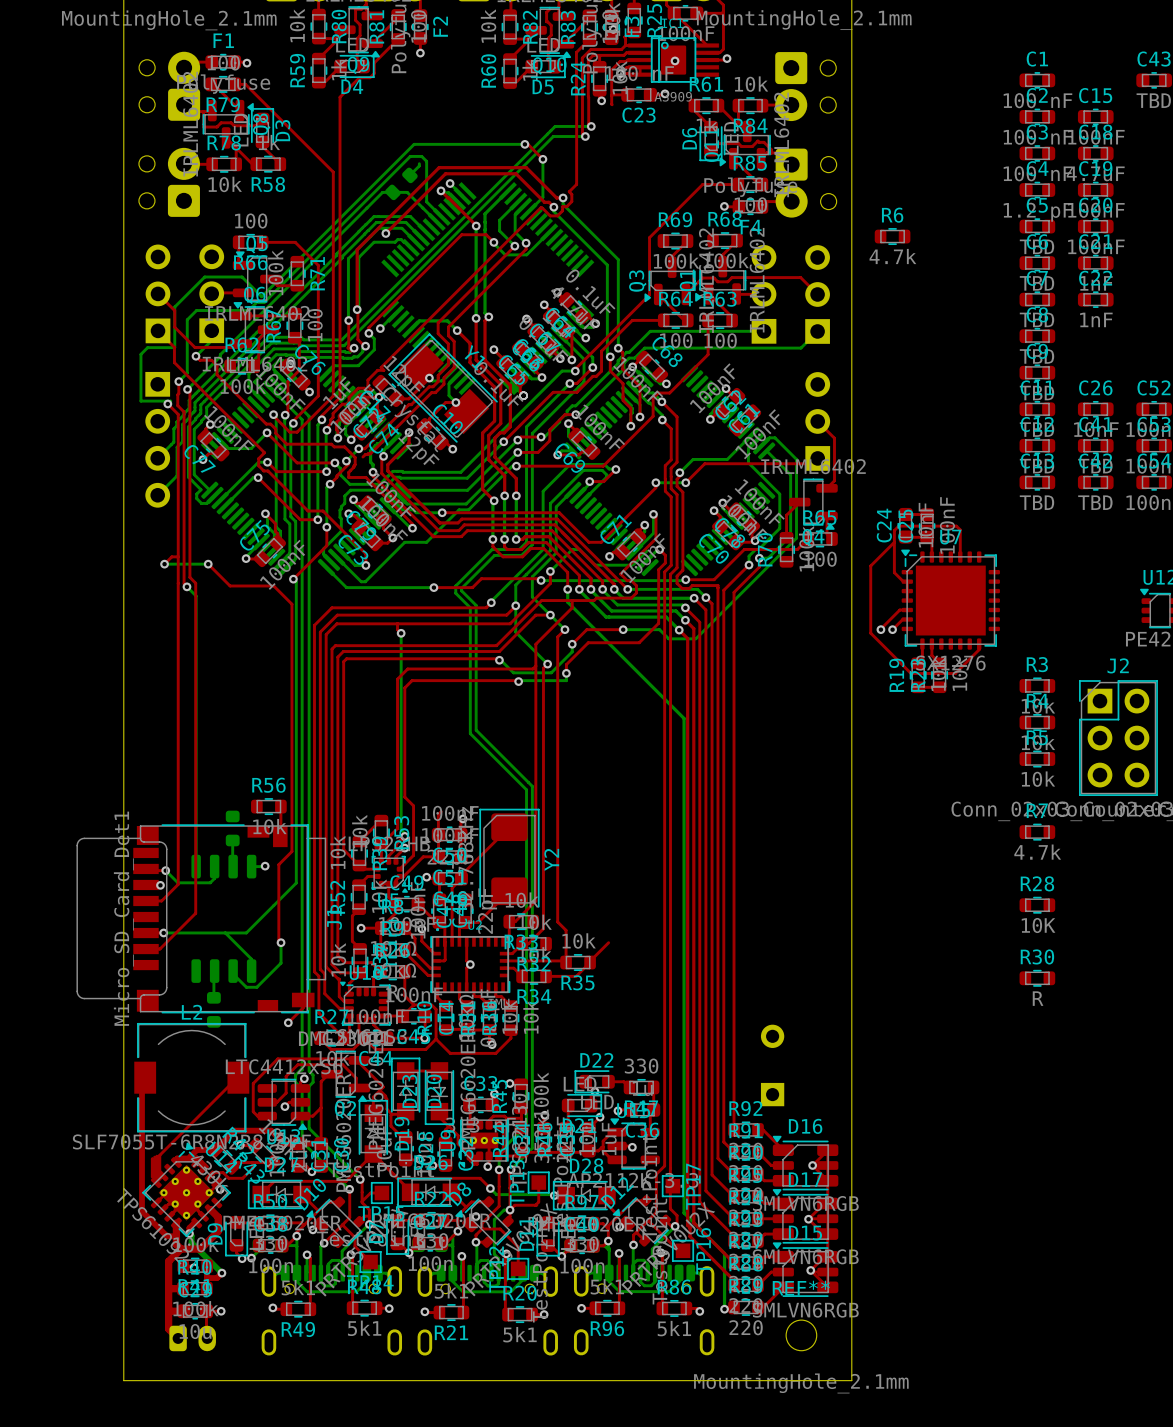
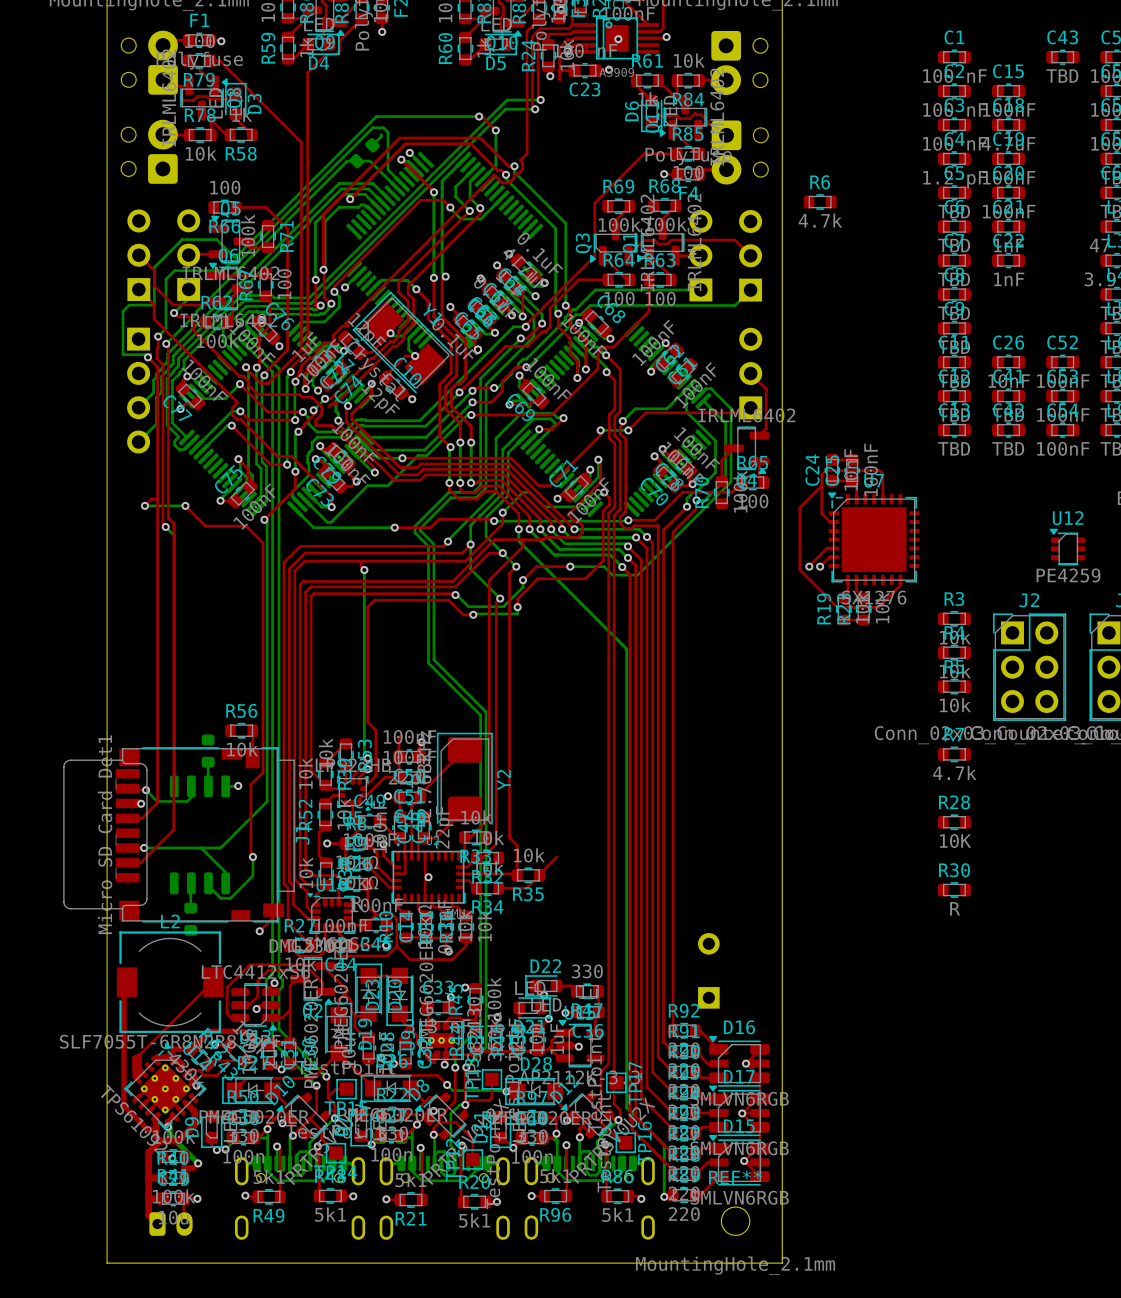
top track: (535, 666) (532, 668) (407, 668) (397, 679) (397, 828) (381, 844) -> none
top track: (518, 681) (412, 680) (404, 687) -> (473, 614) (463, 614) (448, 600) (374, 600) (367, 607) (367, 620)

